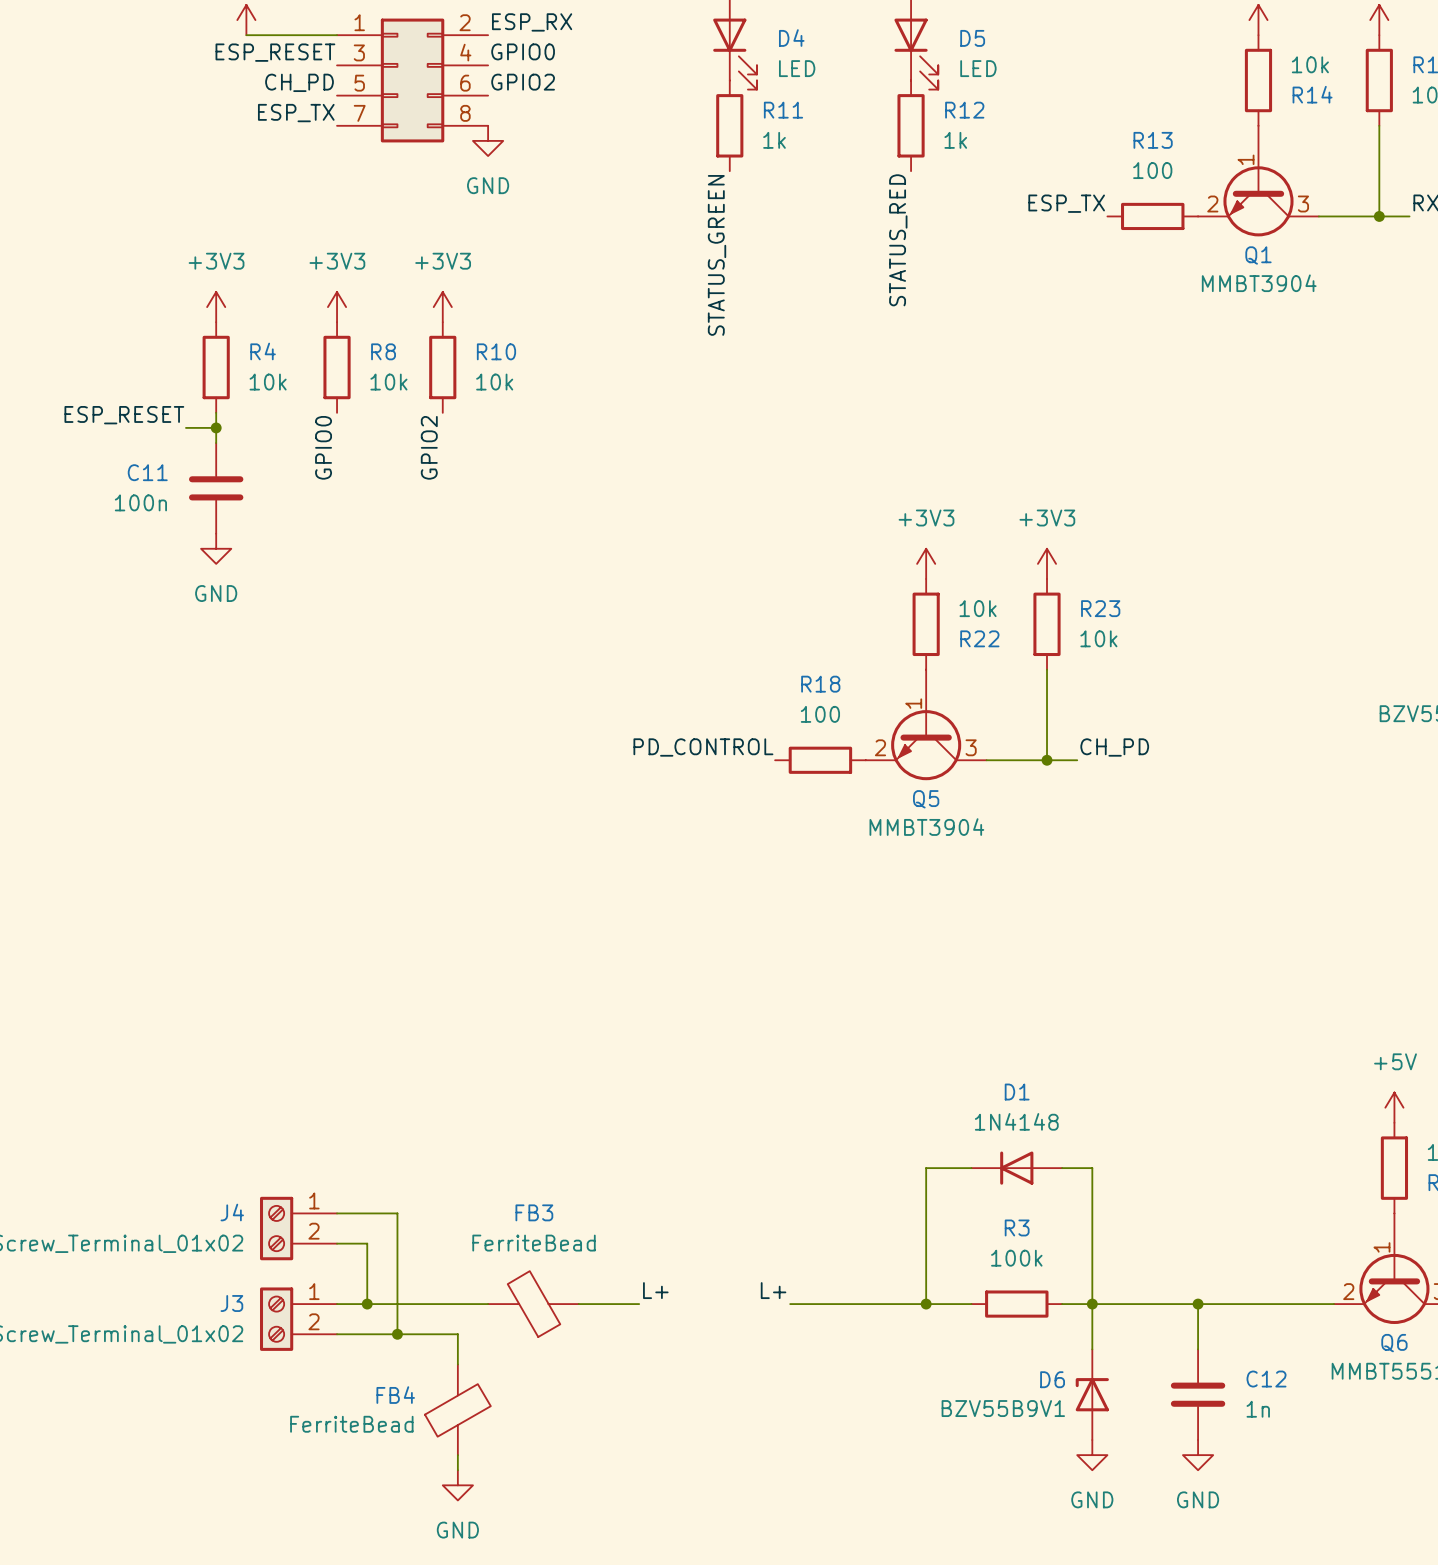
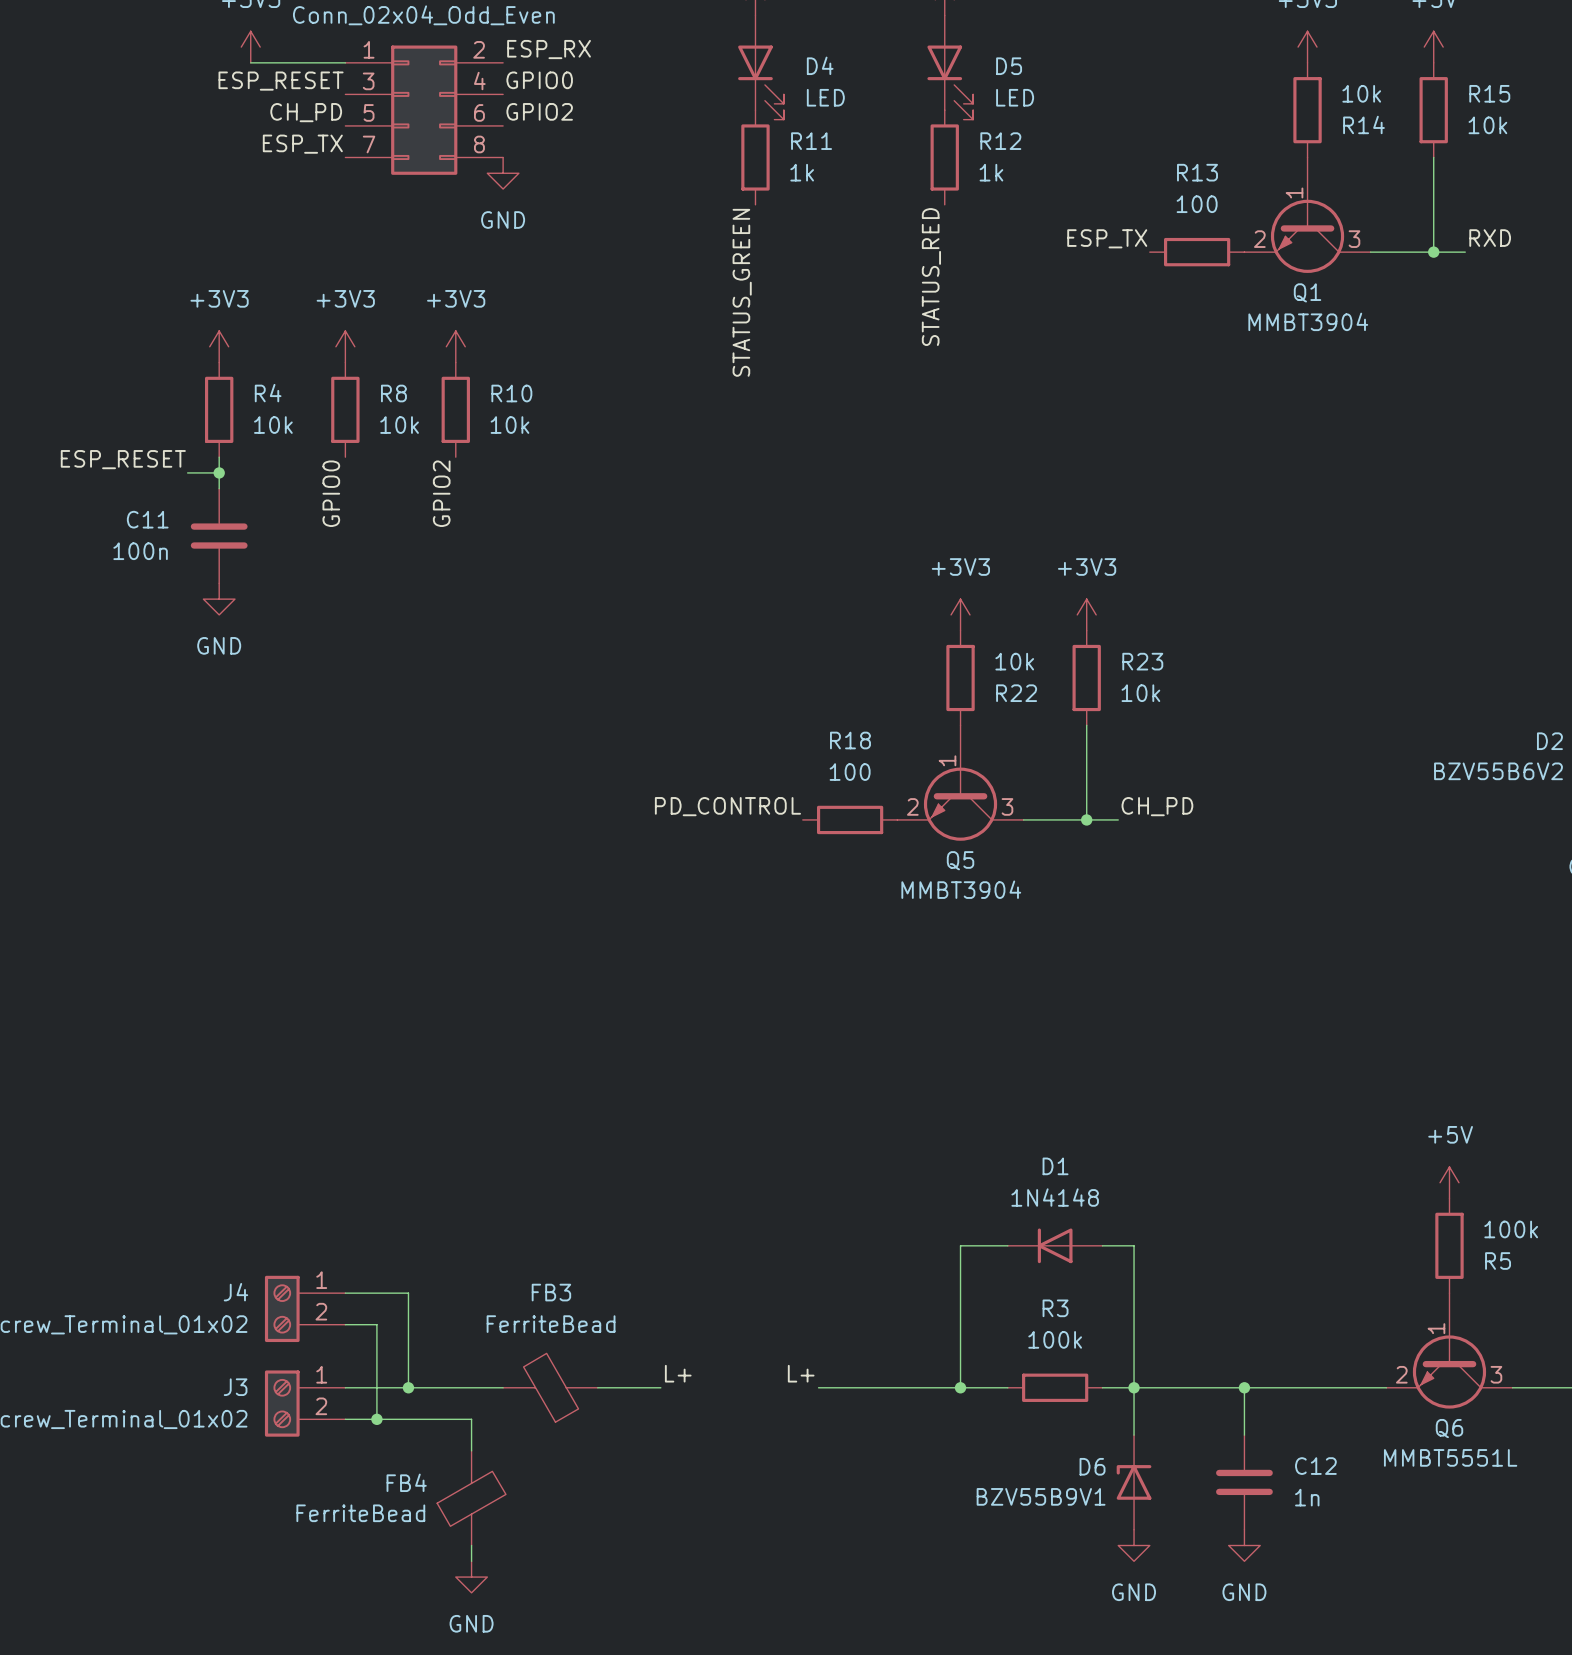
junction: (367, 1304) -> none
wire: (397, 1304) (397, 1334) -> (376, 1387) (376, 1419)
junction: none -> (408, 1387)
junction: none -> (376, 1419)
junction: (397, 1334) -> none

